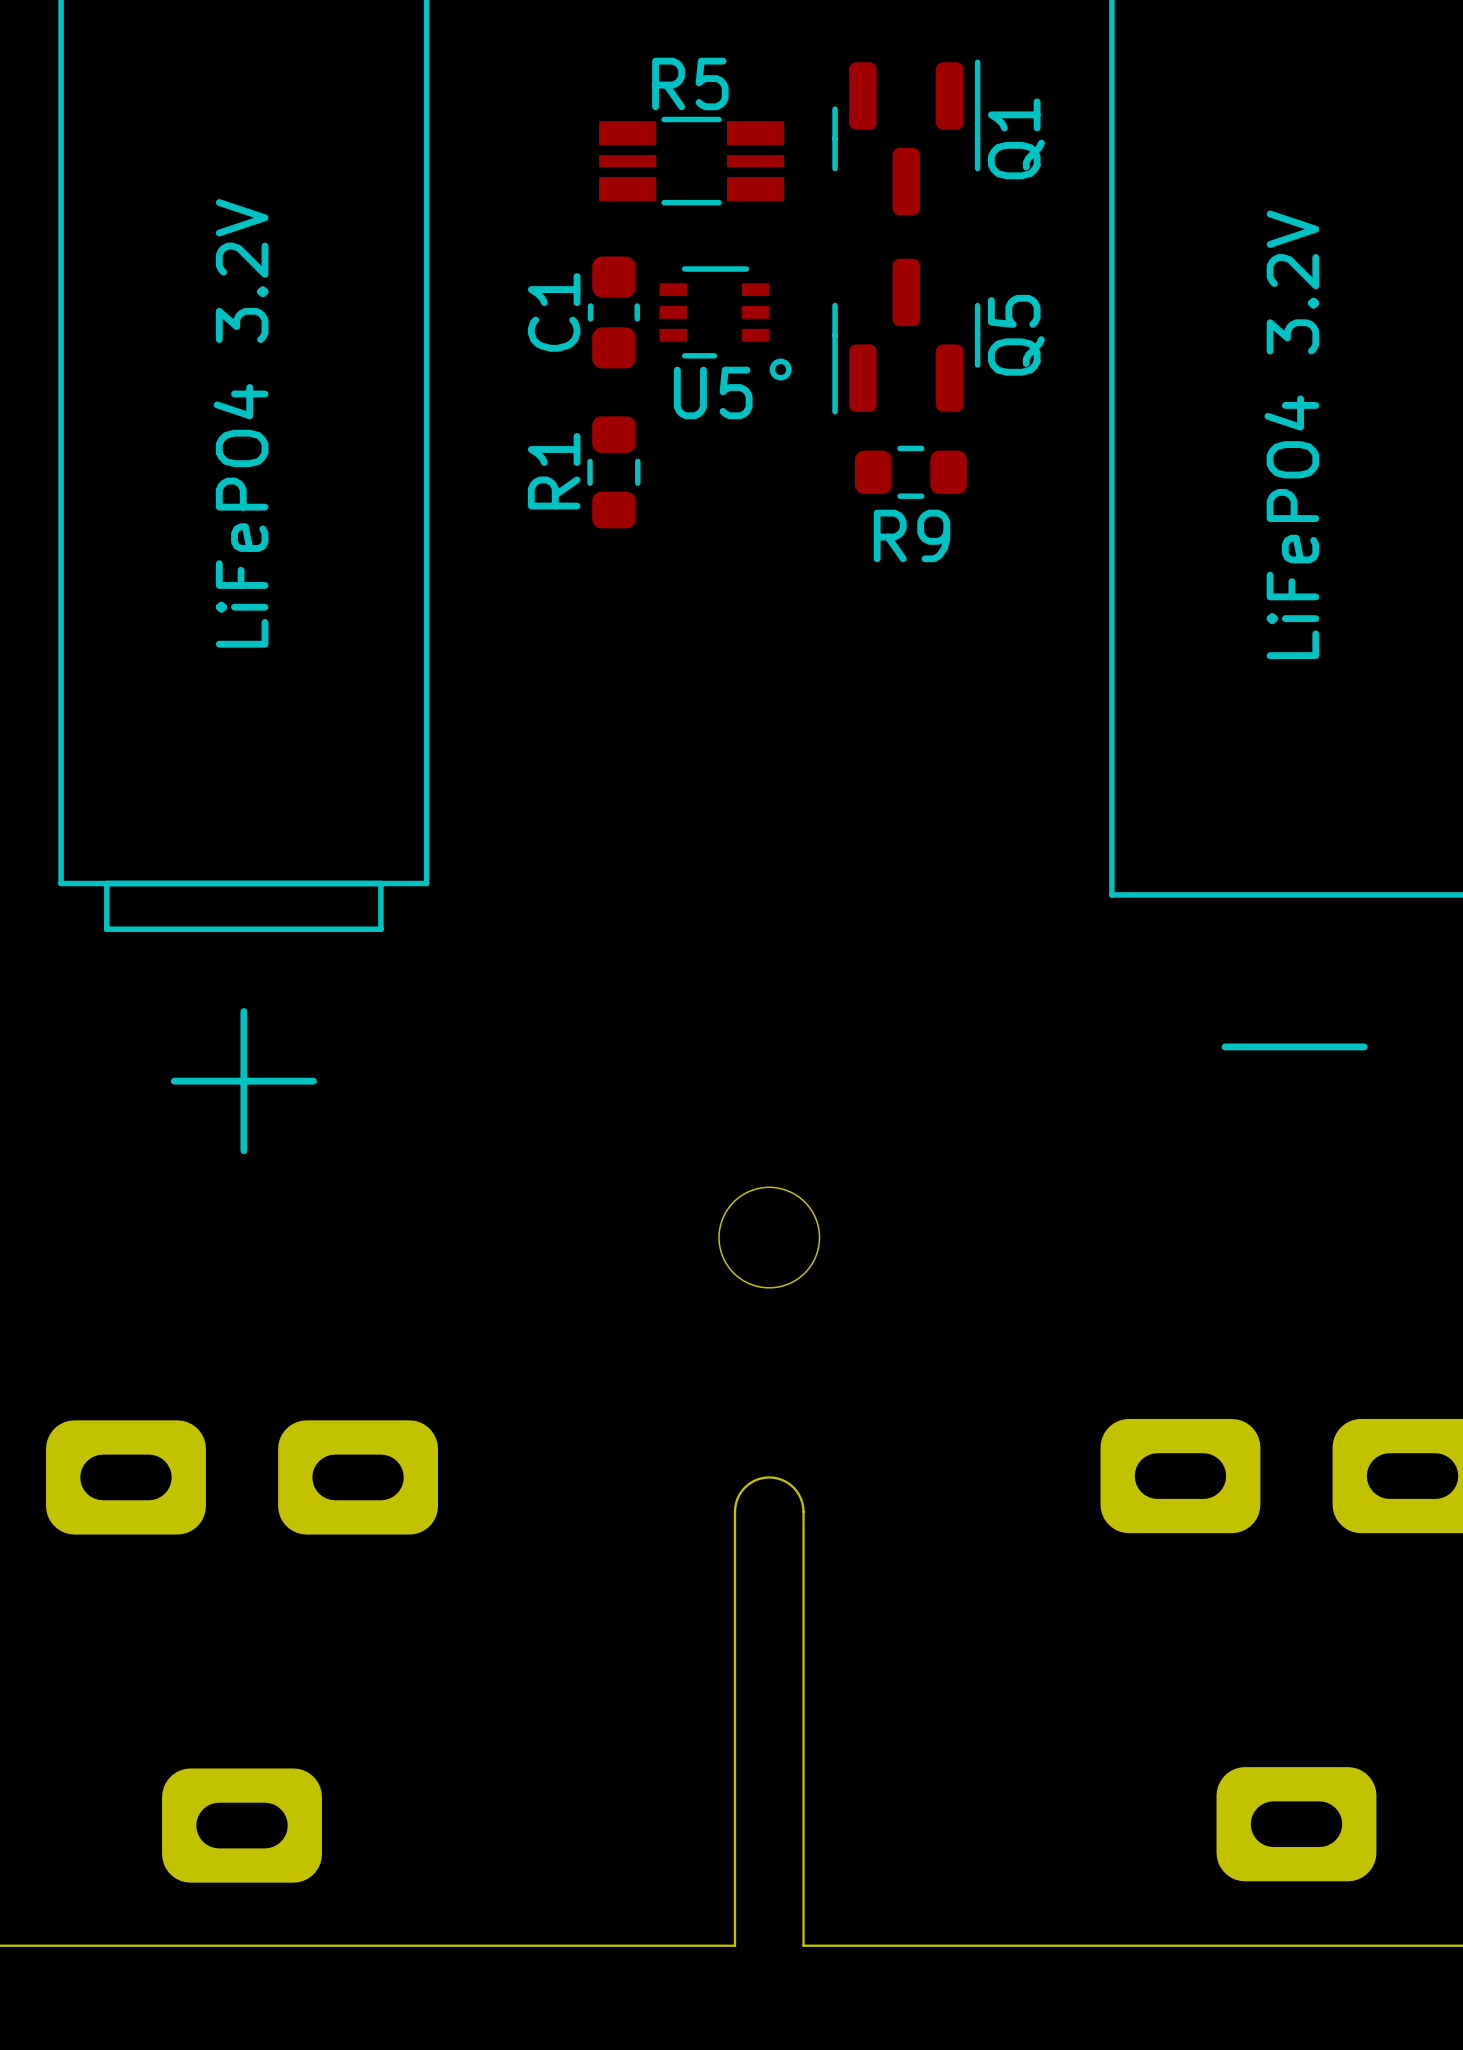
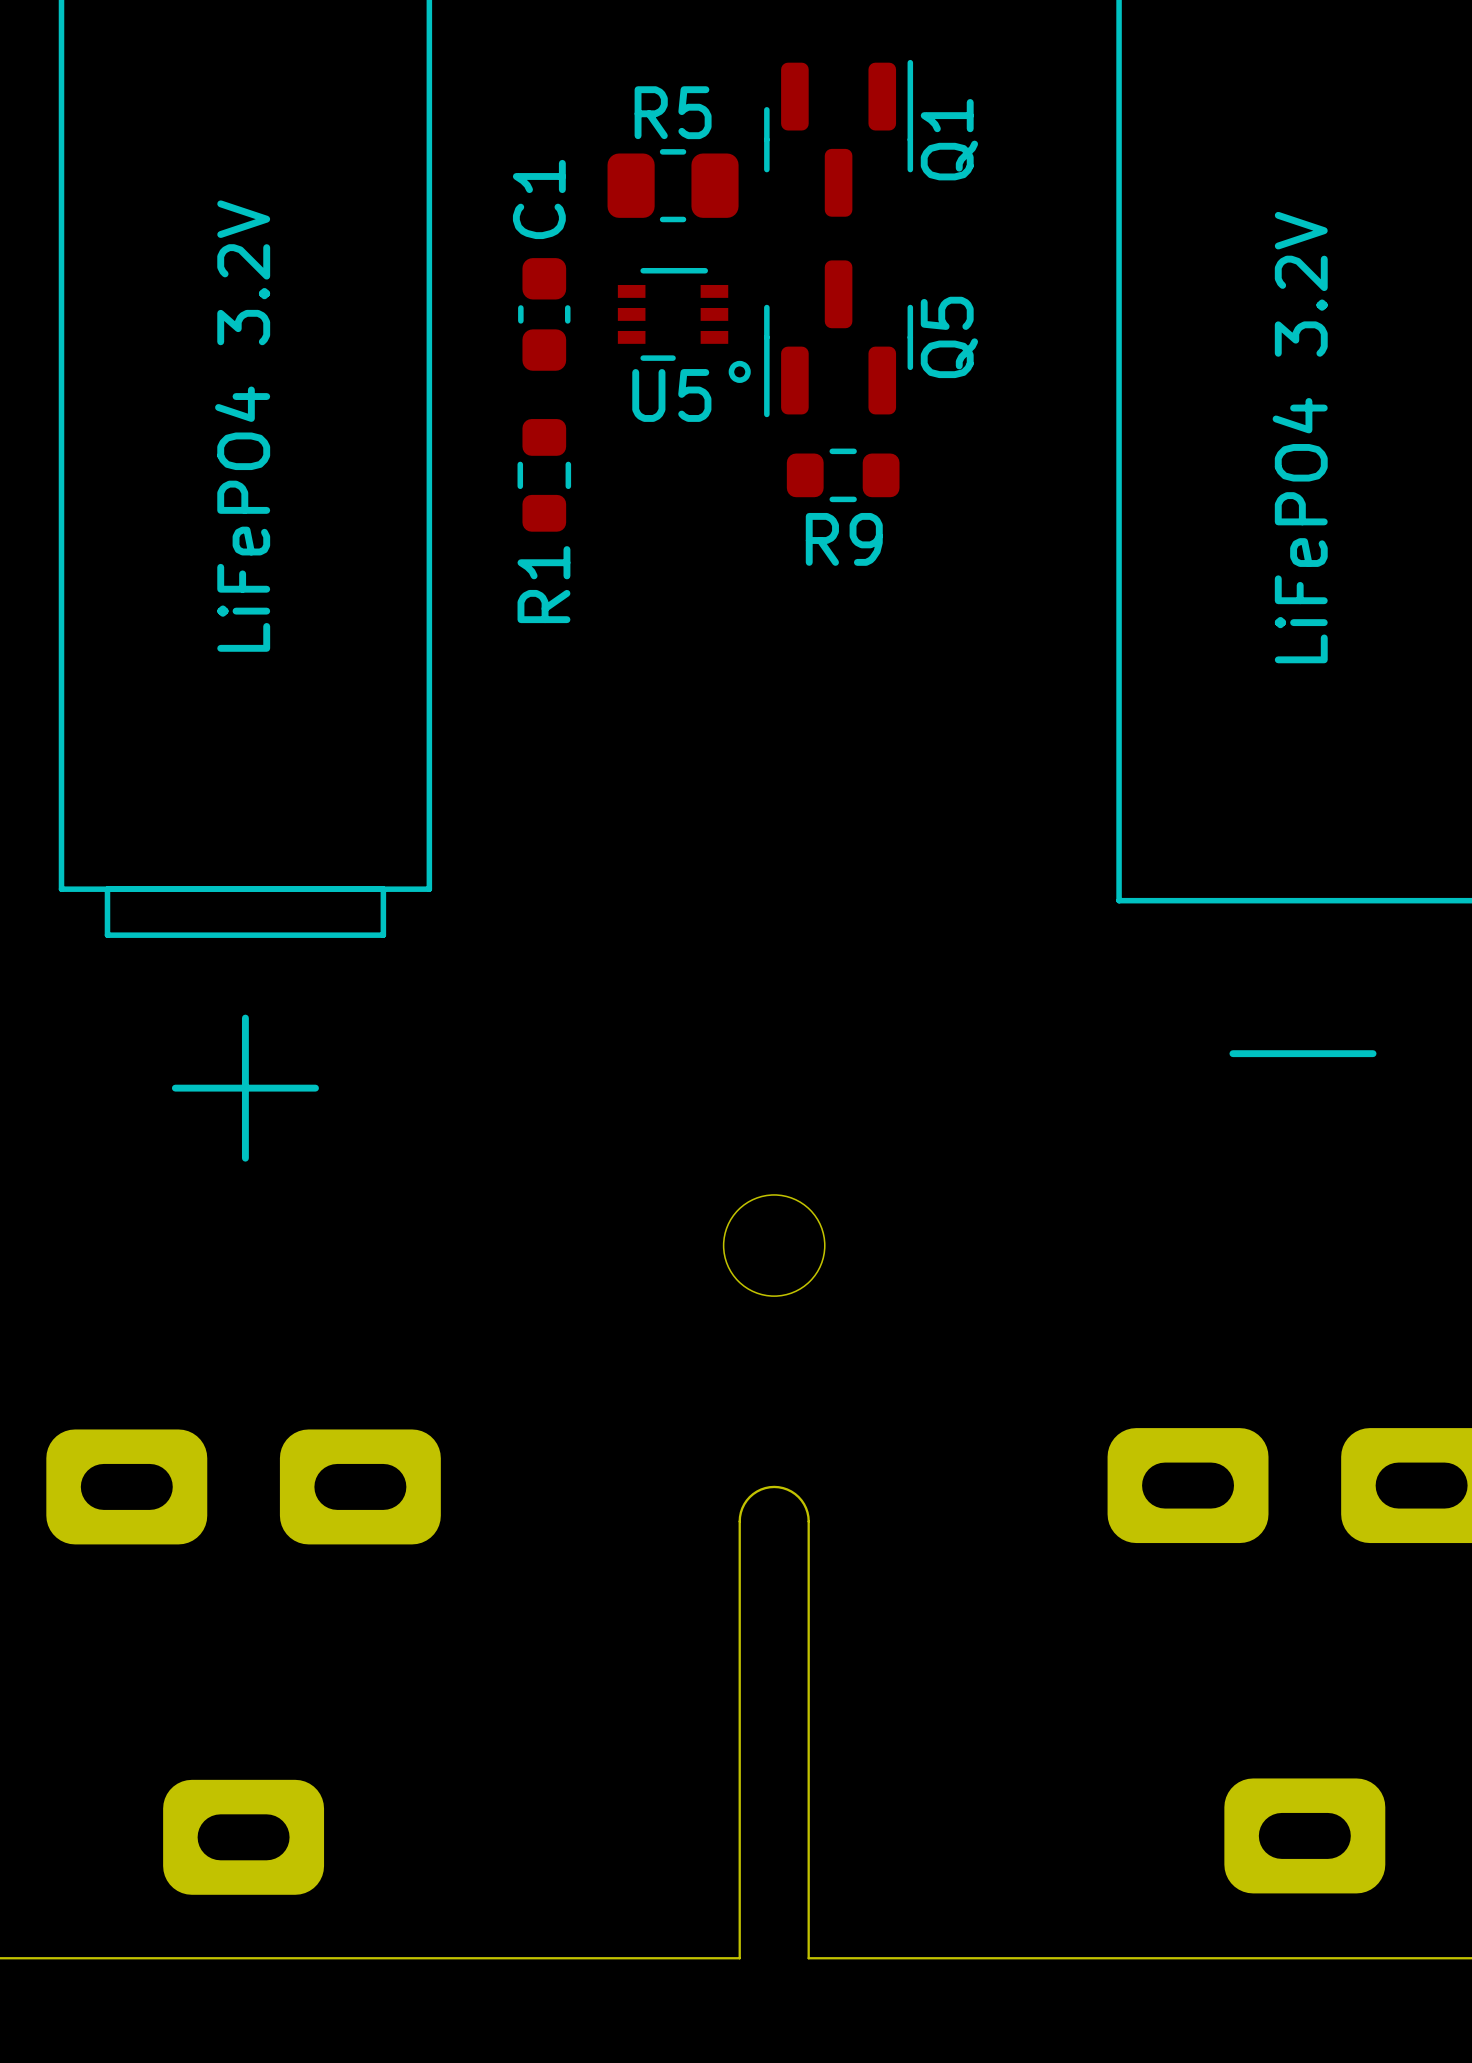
Q1 position: (906, 137) -> (838, 138)
part: (691, 161) -> none
R5: none -> (673, 185)
C1 name position: C1 (554, 312) -> C1 (539, 199)
C1 position: (613, 312) -> (544, 314)
U5 position: (725, 323) -> (684, 325)
Q5 position: (906, 336) -> (838, 338)
R1 name position: R1 (554, 471) -> R1 (543, 584)
R1 position: (613, 472) -> (544, 475)
R9 position: (910, 472) -> (843, 475)

